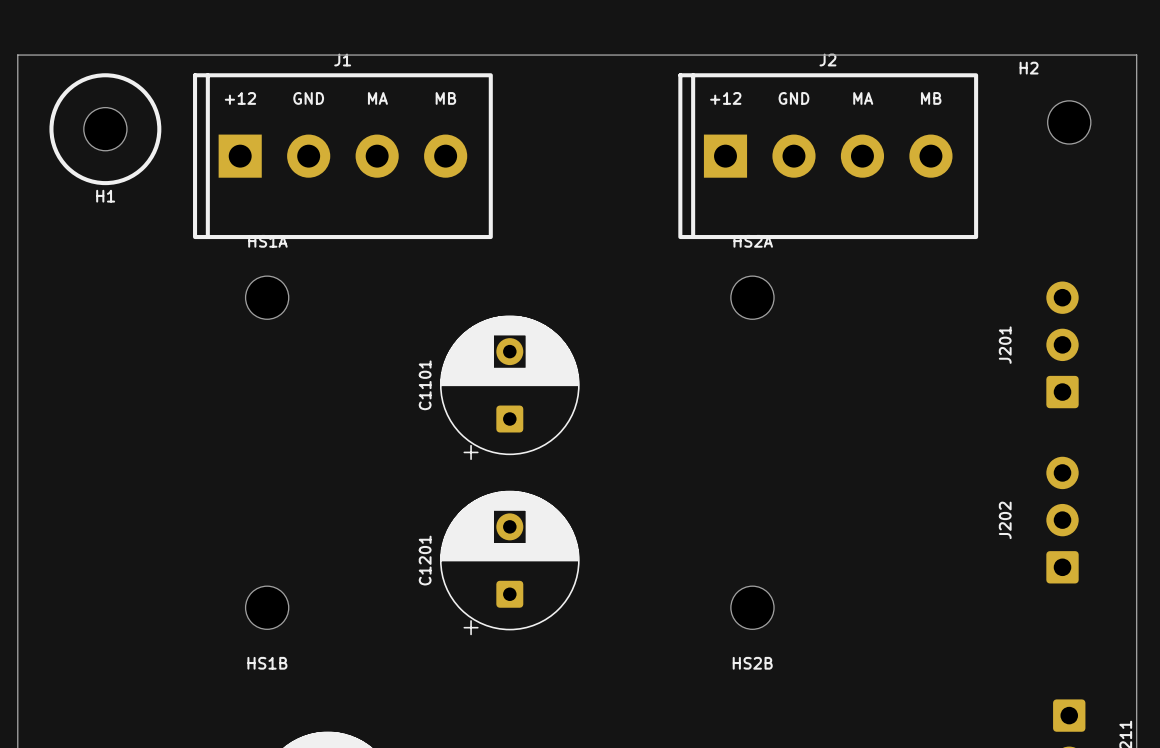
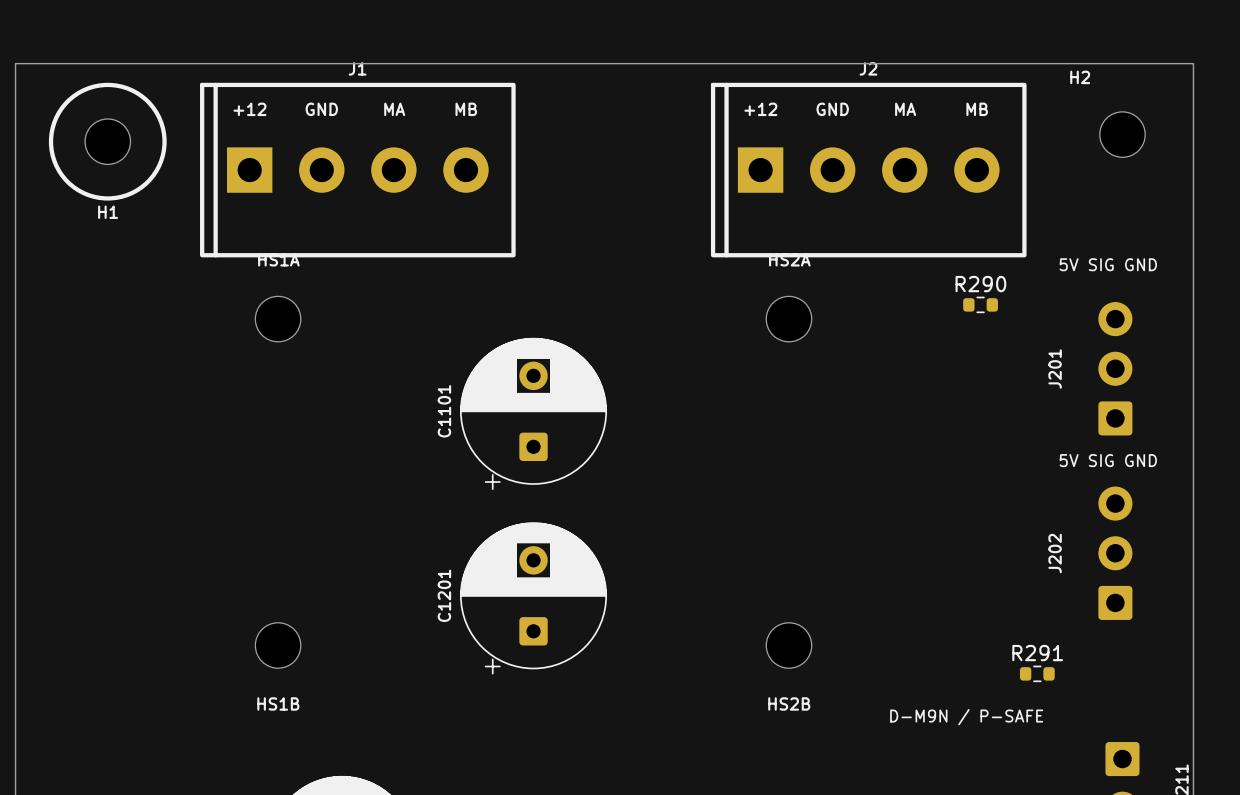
text: none -> 5V SIG GND (1108, 264)
R290: none -> (980, 304)
text: none -> 5V SIG GND (1108, 460)
R291: none -> (1037, 673)
text: none -> D-M9N / P-SAFE (966, 717)

